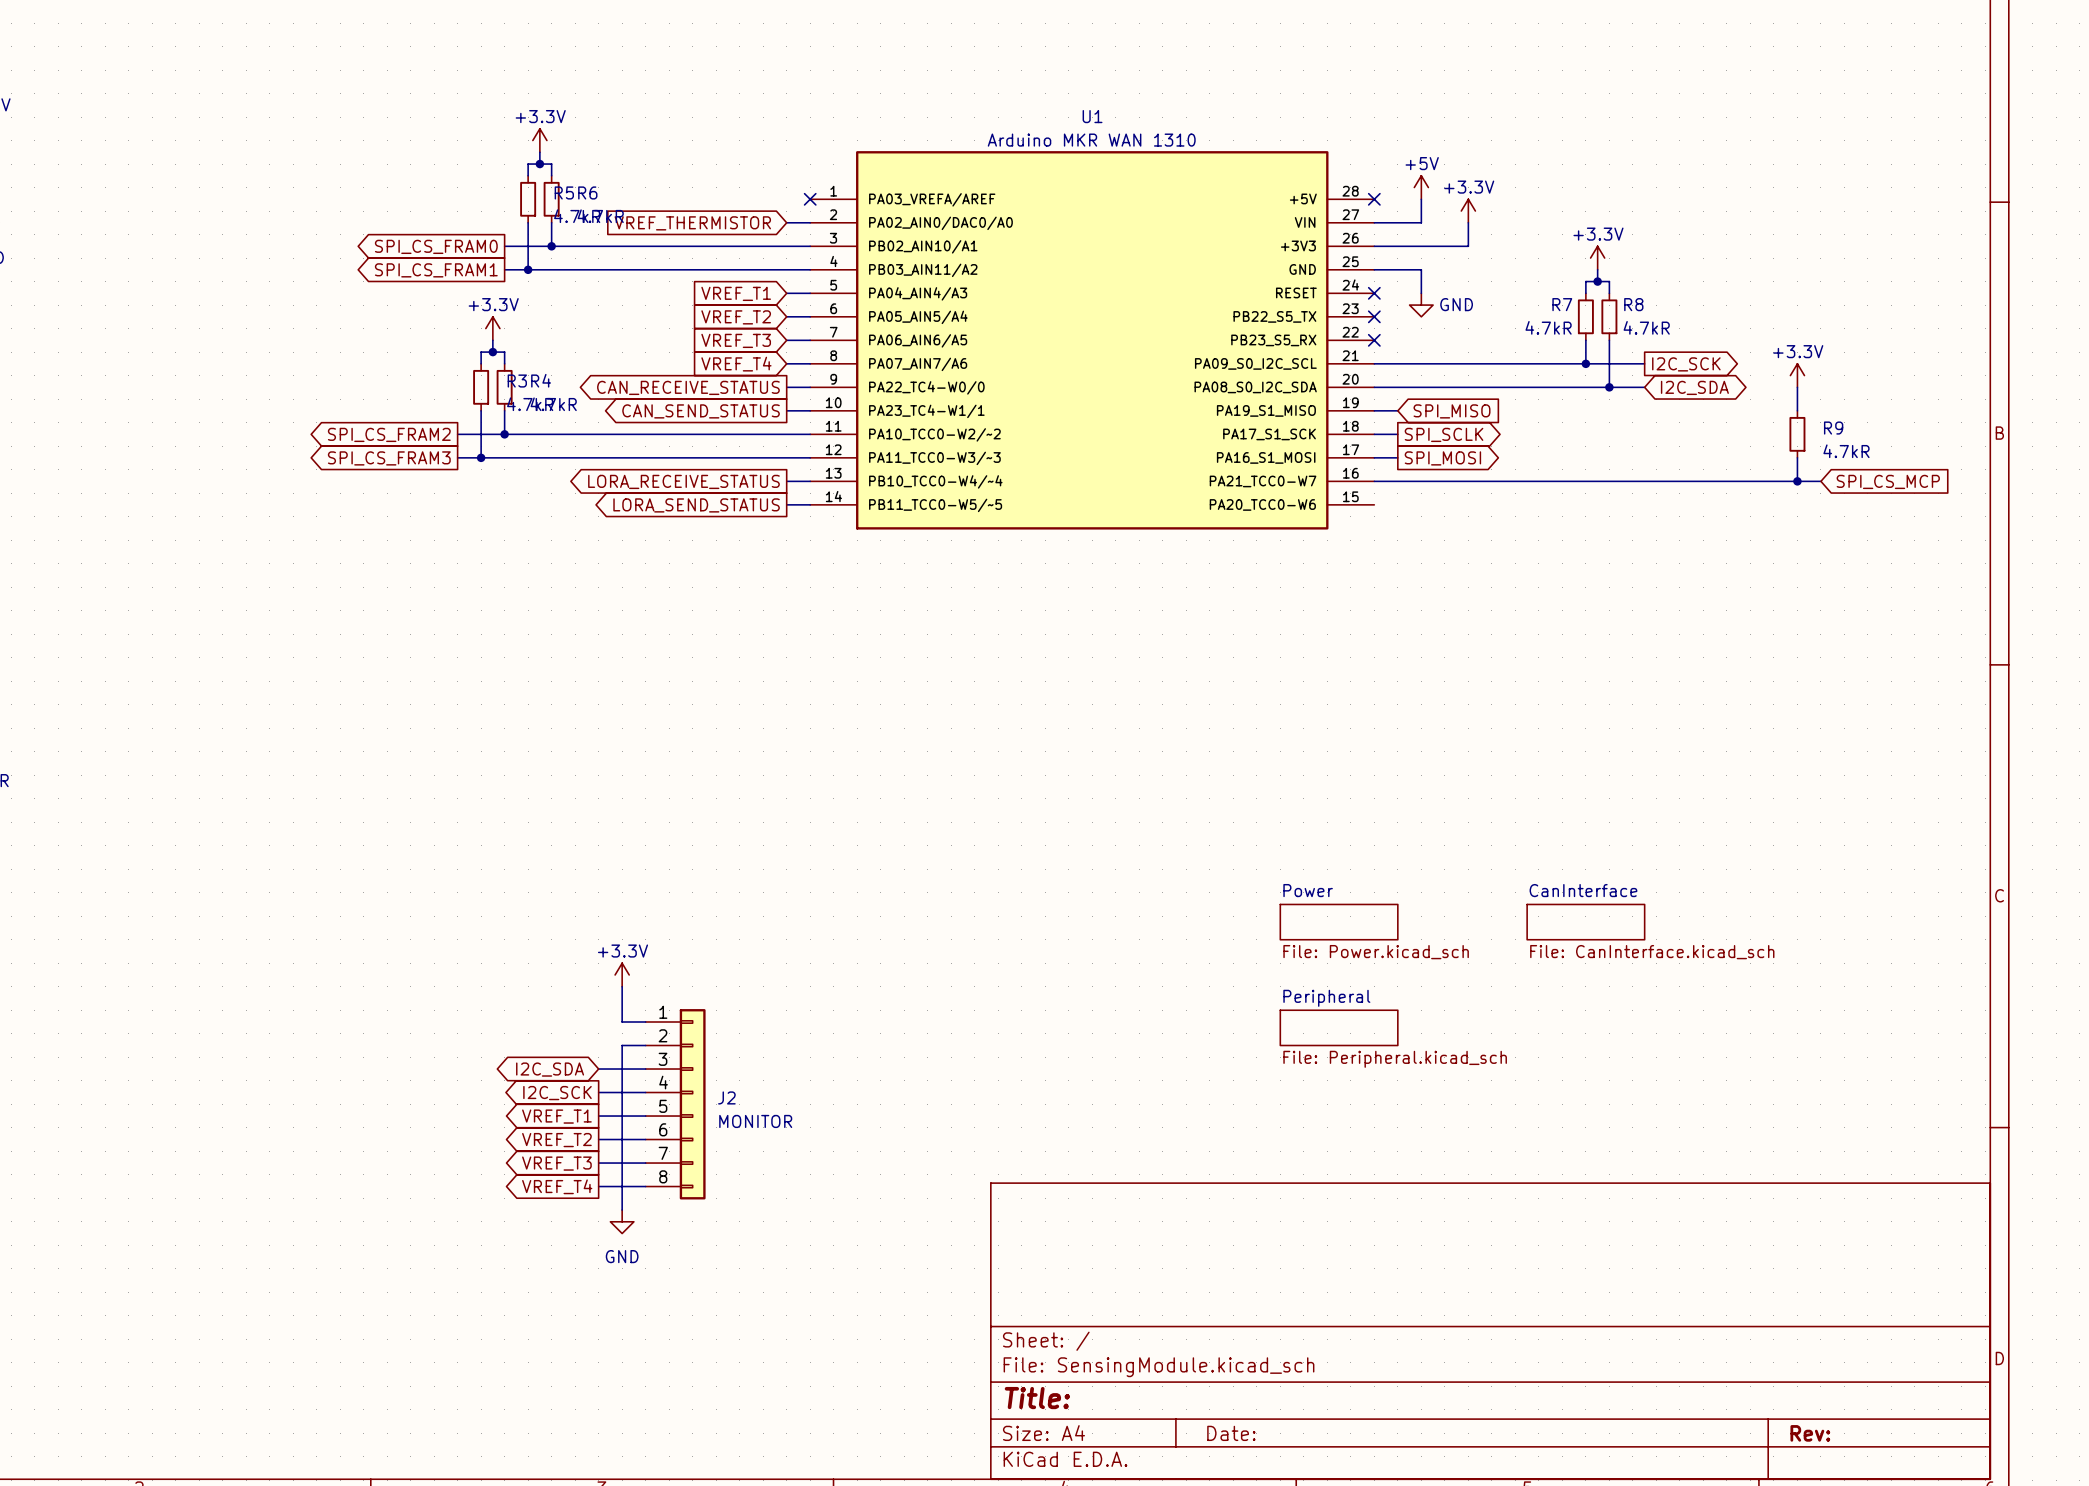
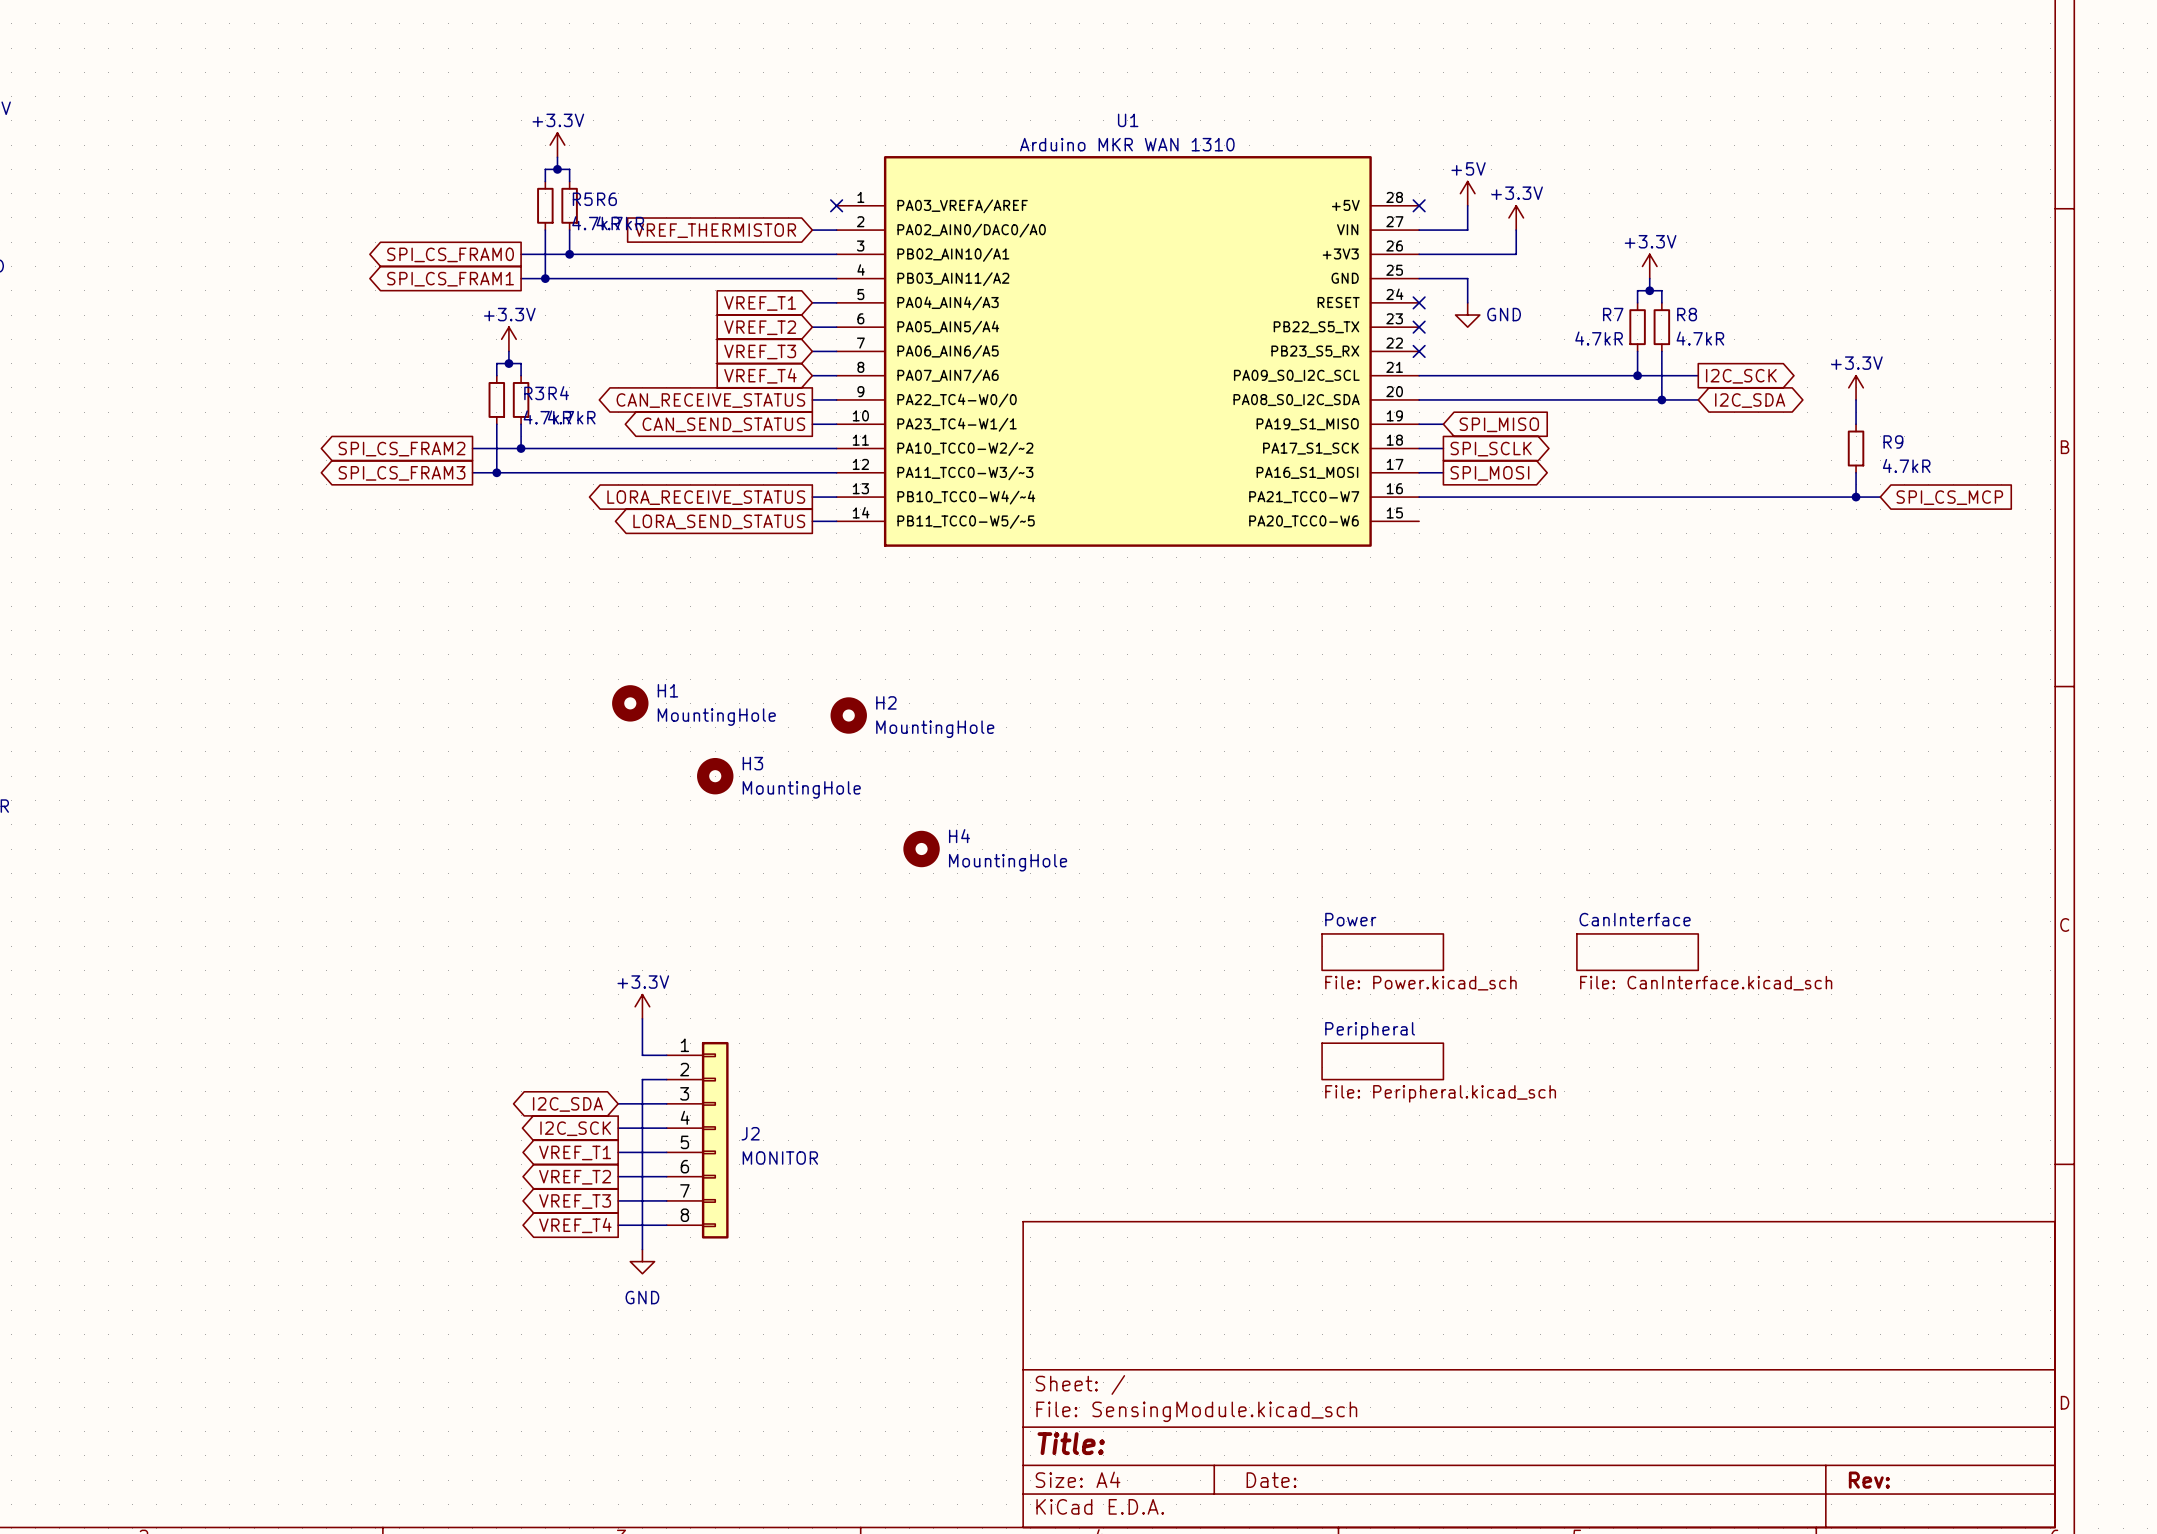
H1: none -> MountingHole (630, 703)
H2: none -> MountingHole (848, 715)
H3: none -> MountingHole (715, 776)
H4: none -> MountingHole (921, 849)

